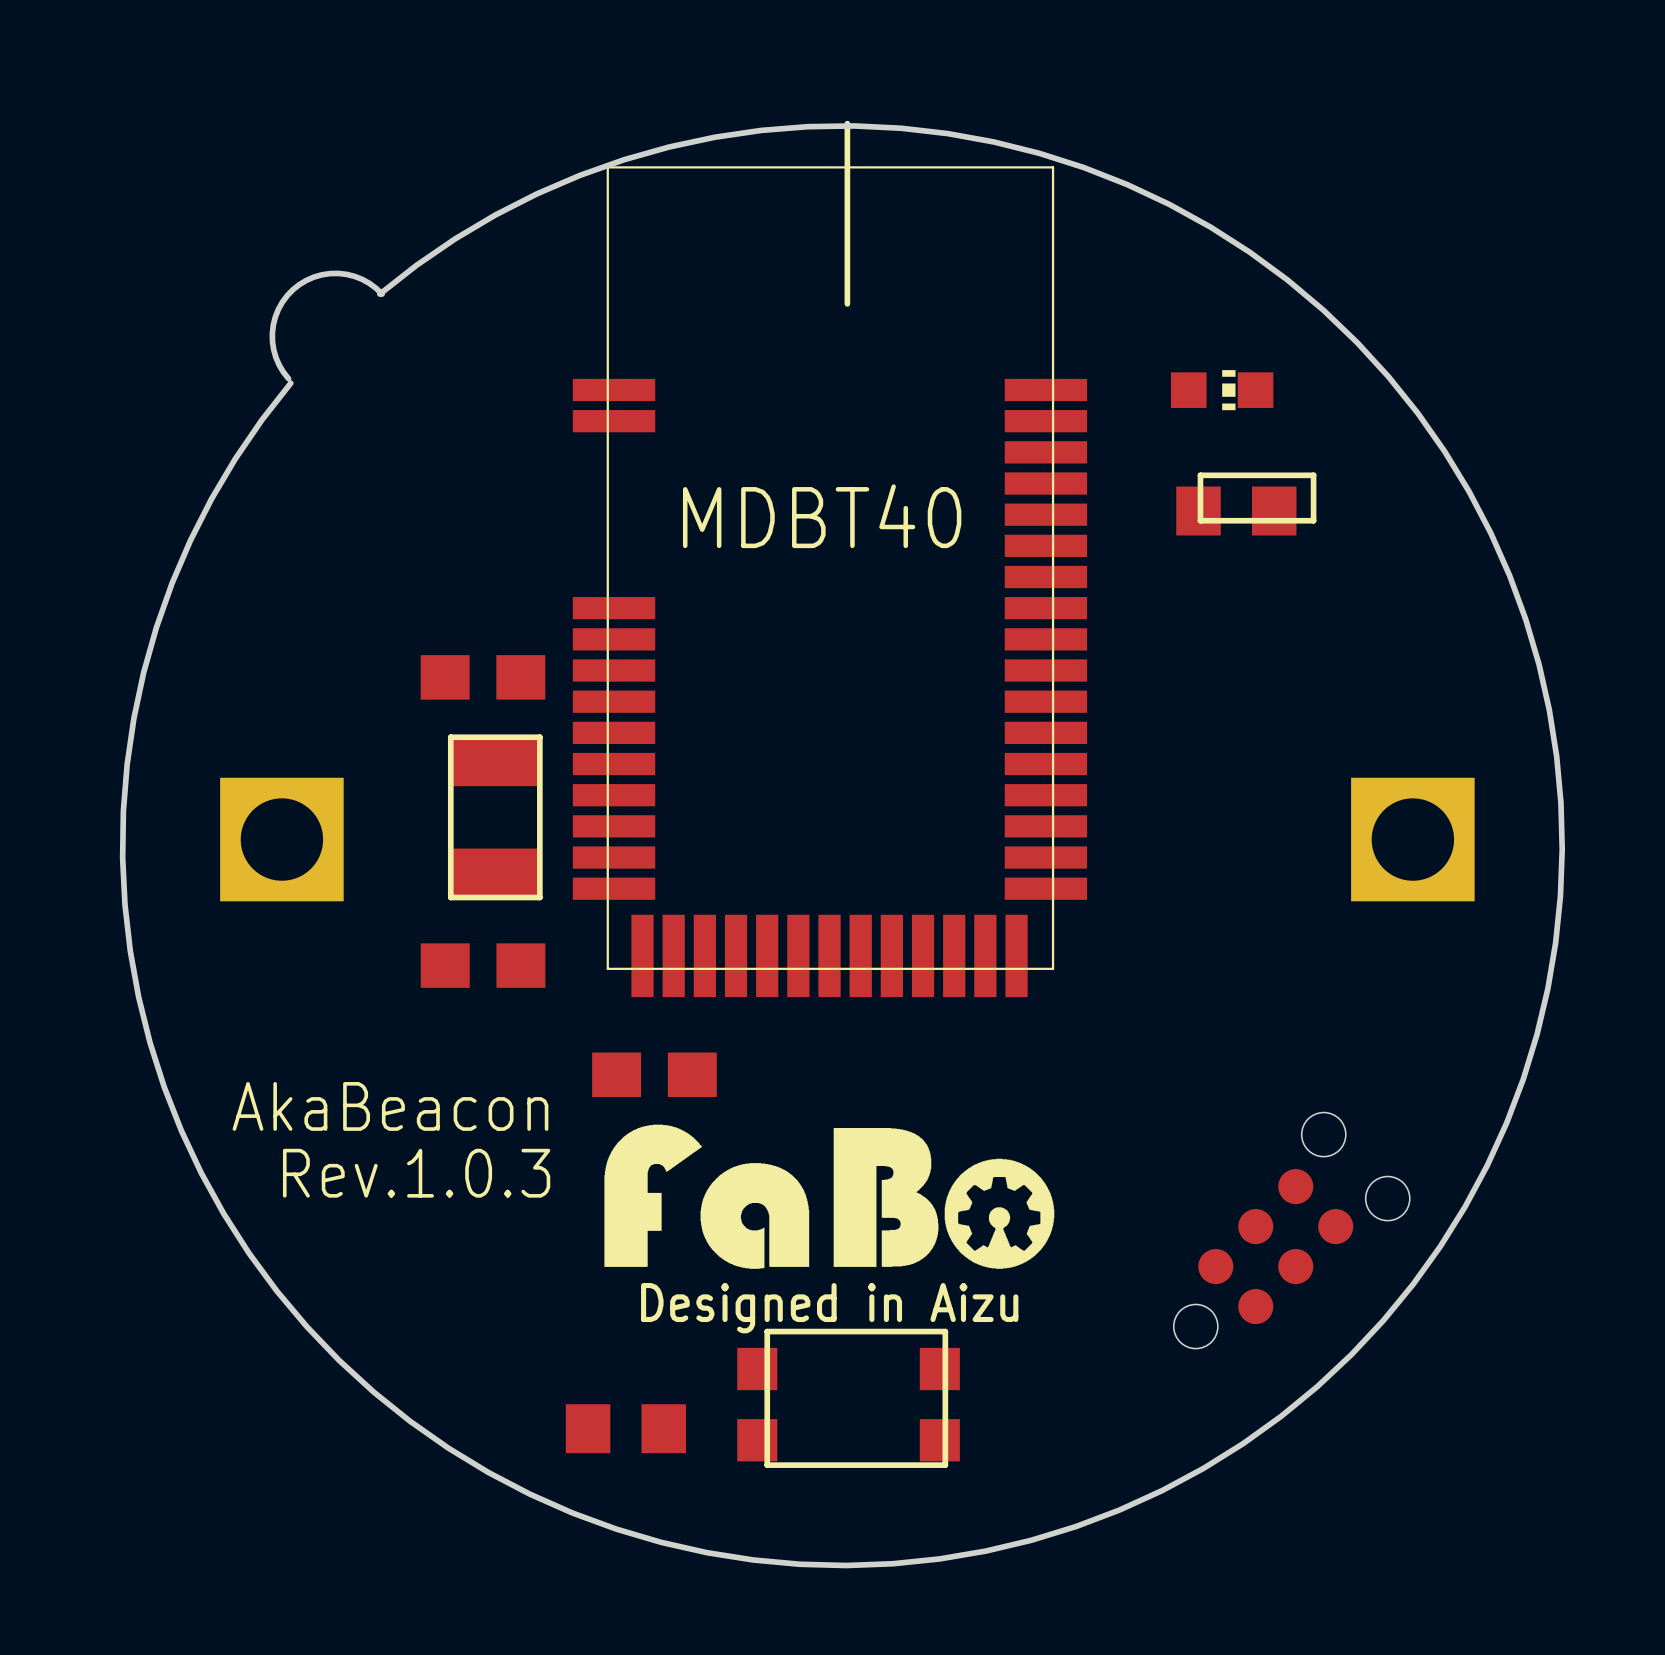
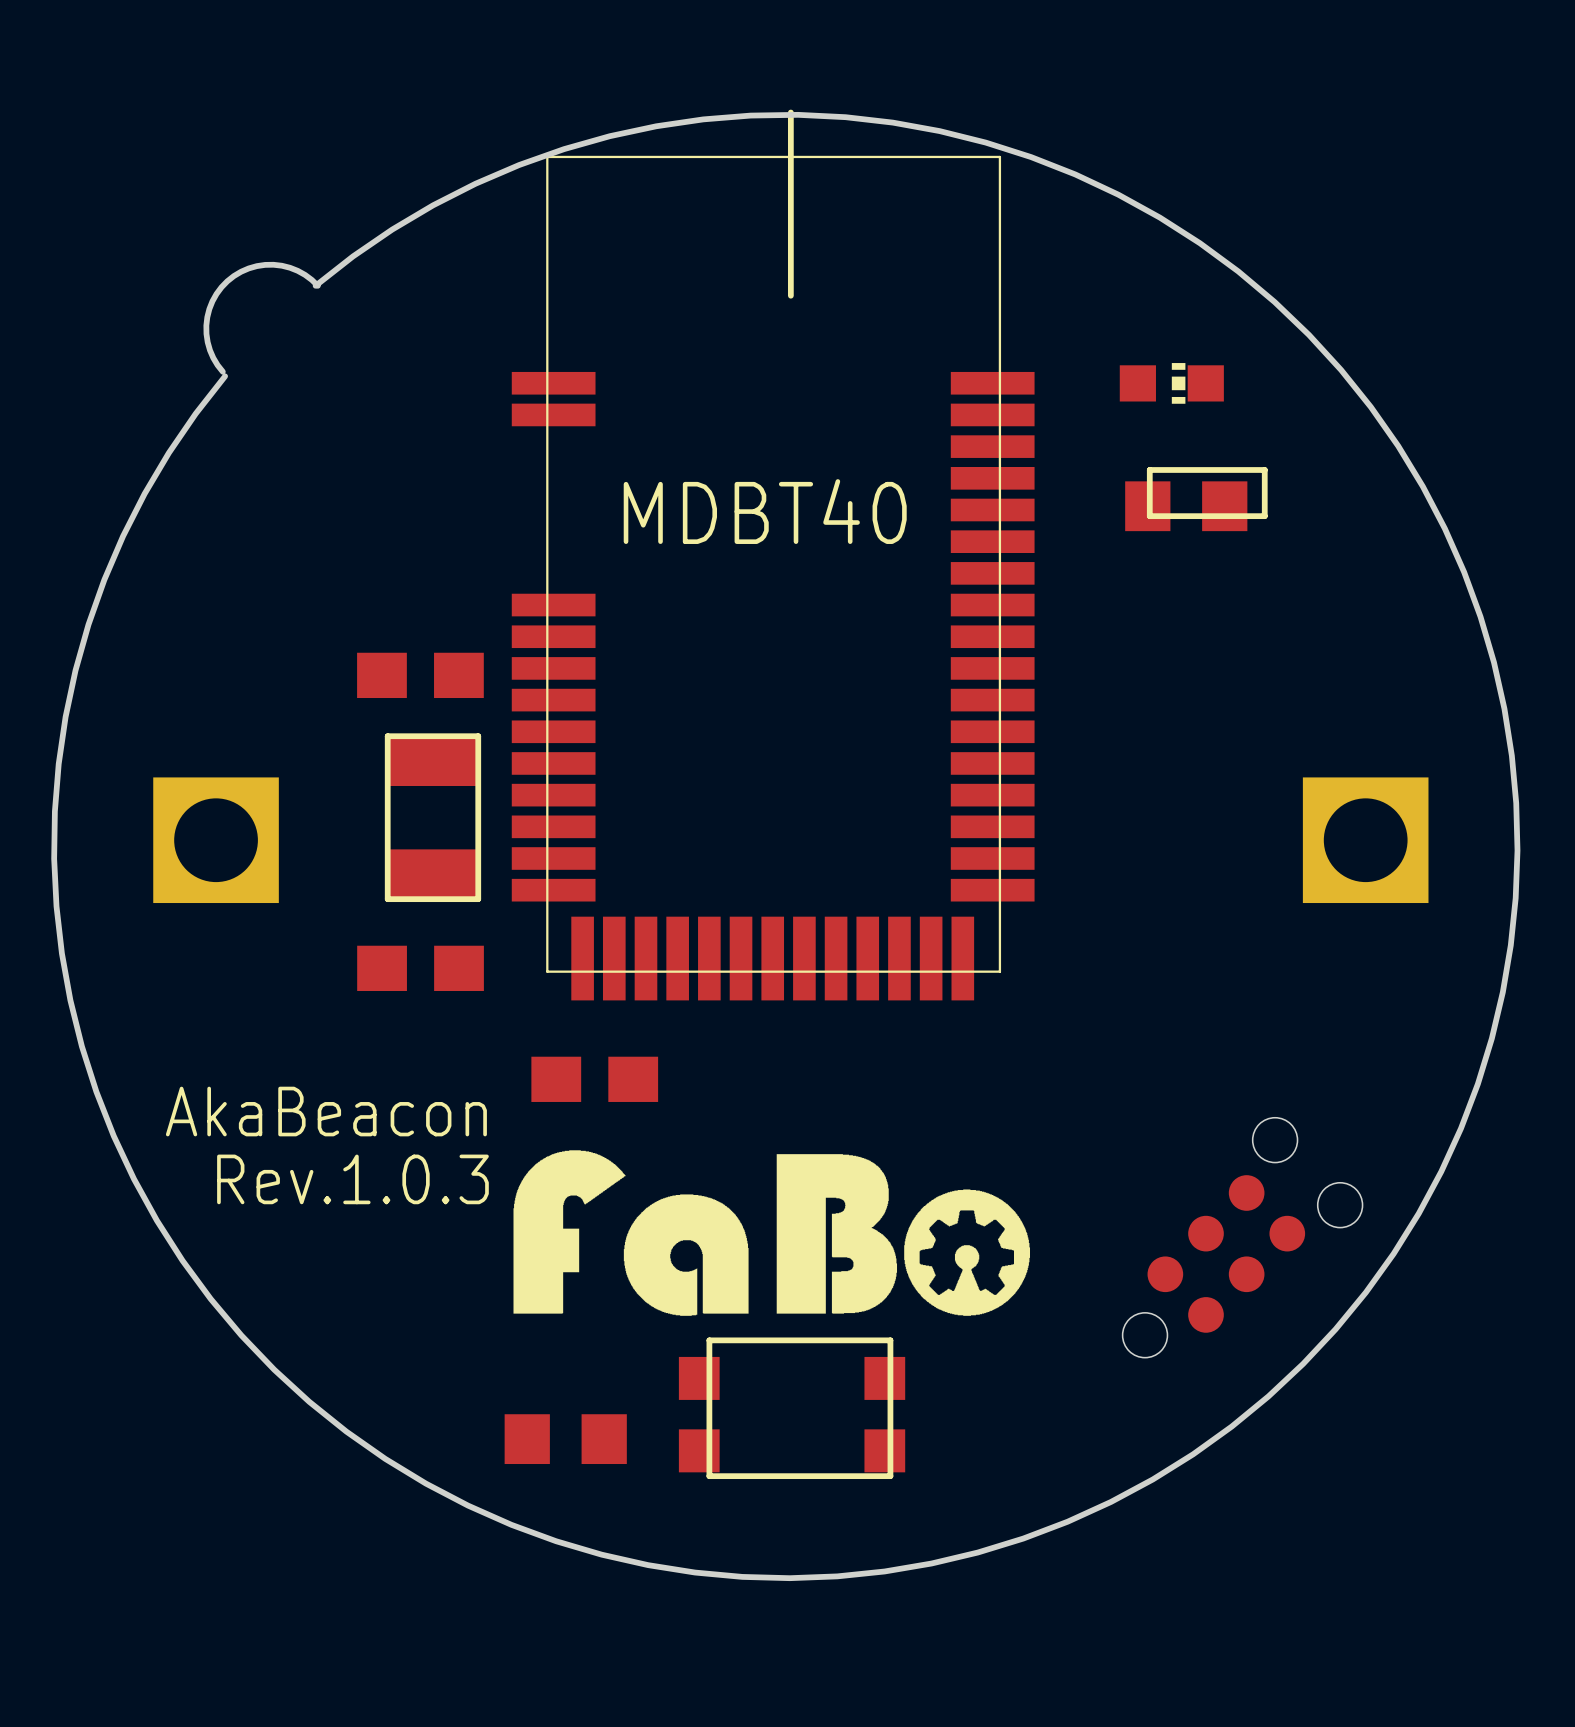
drawing shape: [604, 1124, 1055, 1269] -> [513, 1150, 1031, 1316]
text: Designed in Aizu (829, 1308) -> none

